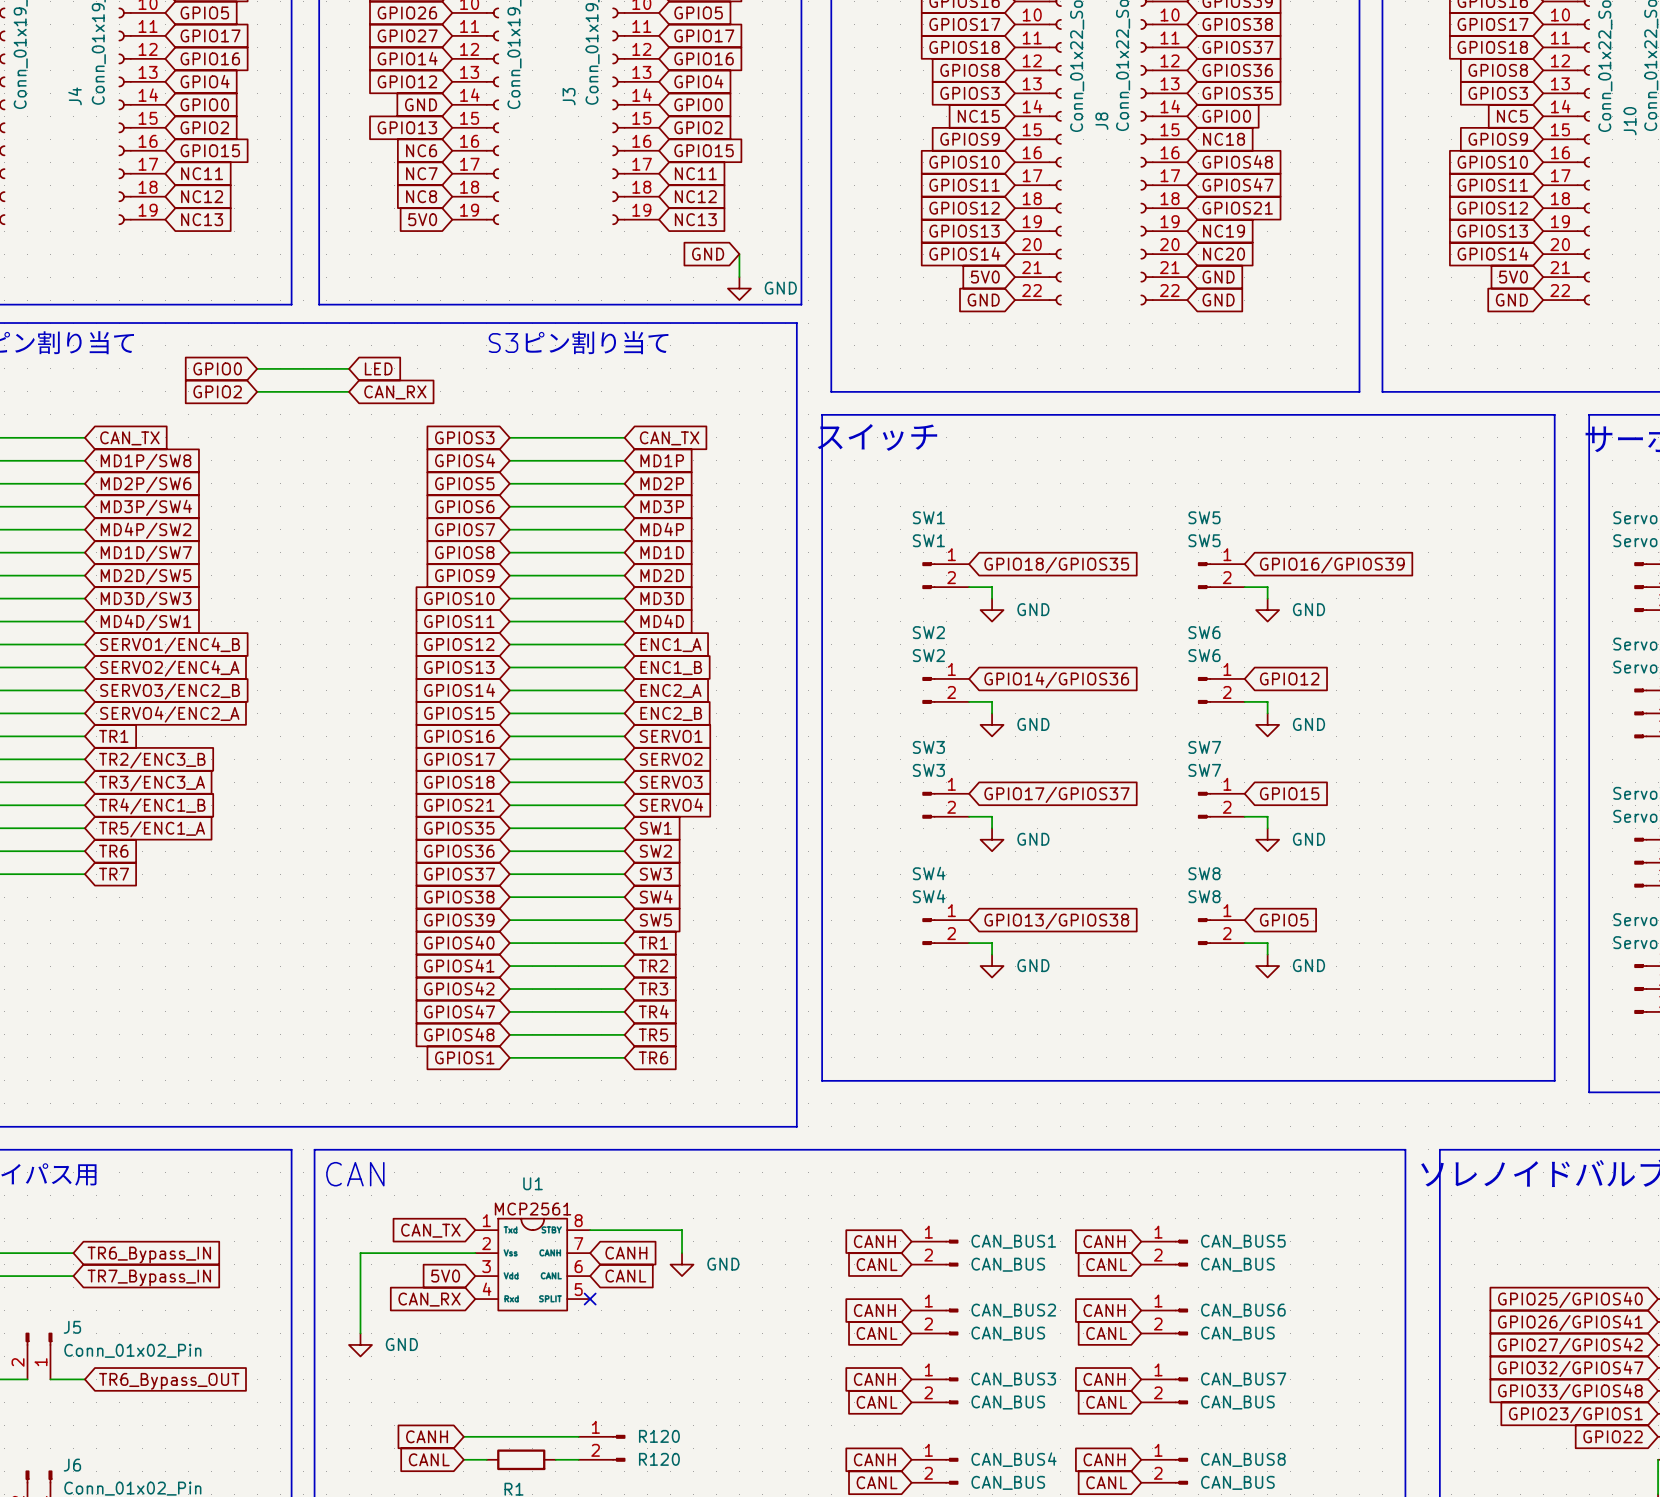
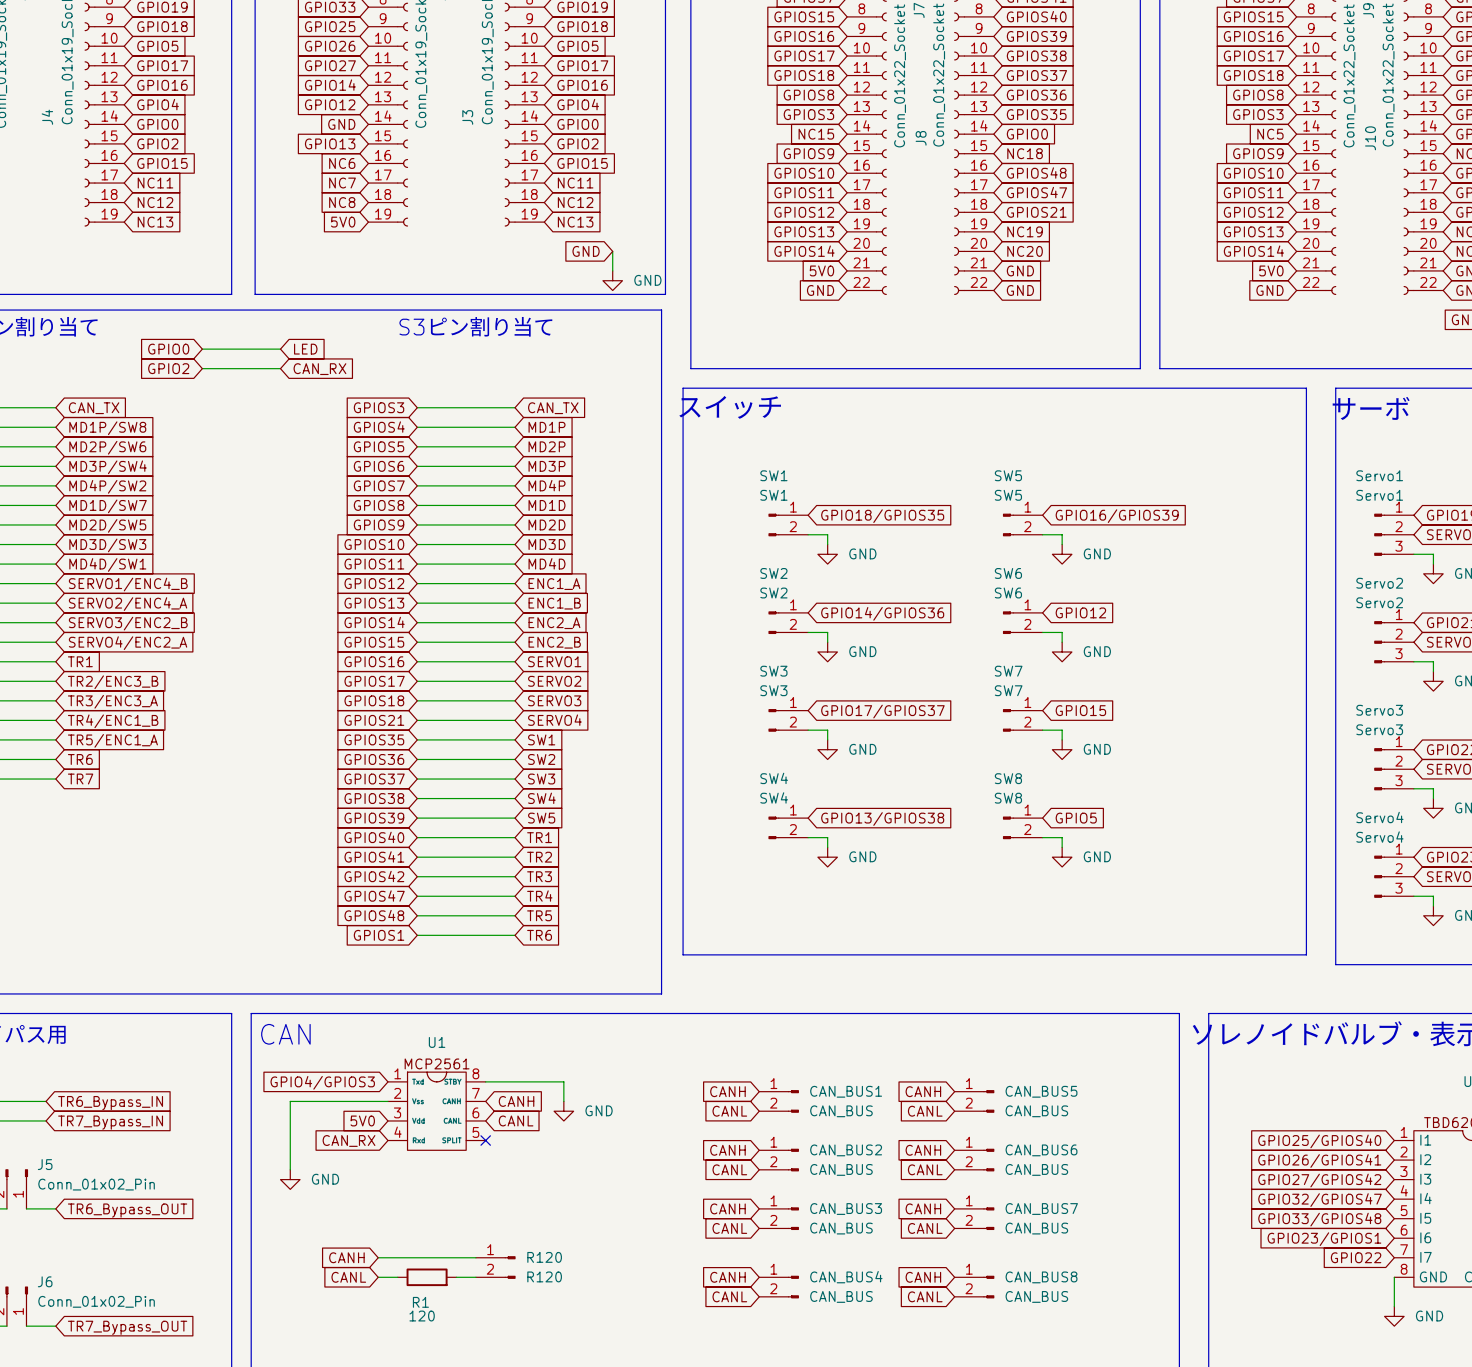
global label: CAN_TX (430, 1230) -> GPIO4/GPIOS3 (322, 1082)

